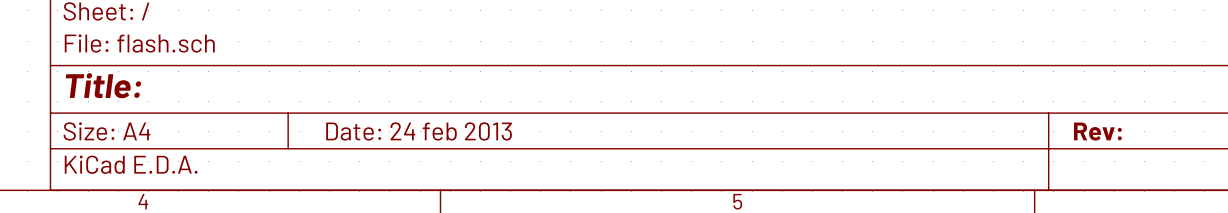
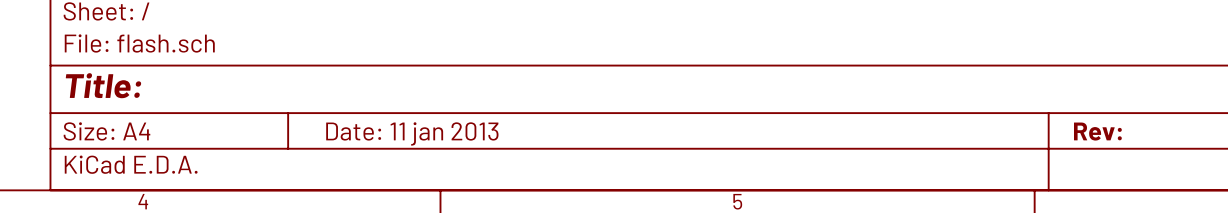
title block: Date: 24 feb 2013 (419, 131) -> Date: 11 jan 2013 (412, 133)

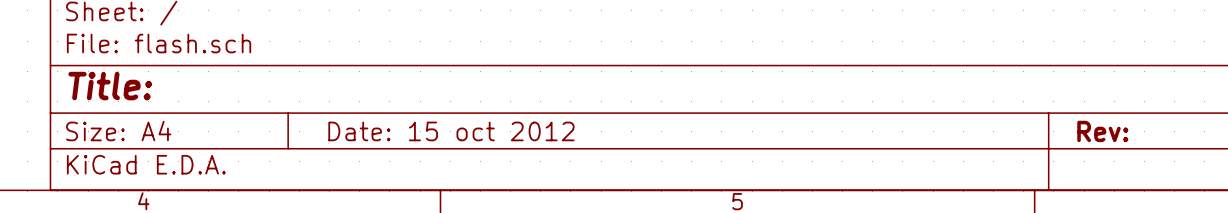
title block: Date: 11 jan 2013 (412, 133) -> Date: 15 oct 2012 (451, 131)

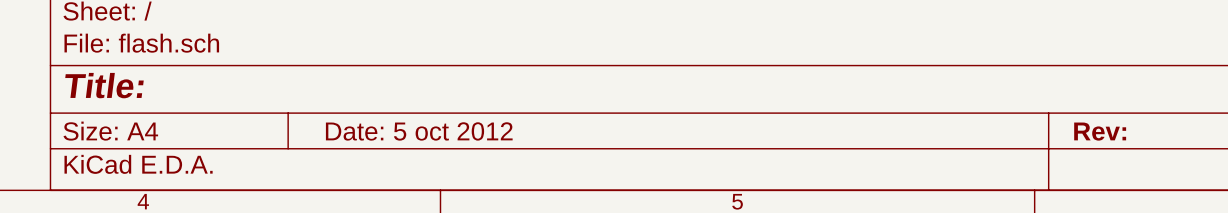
title block: Date: 15 oct 2012 (451, 131) -> Date: 5 oct 2012 (419, 131)

